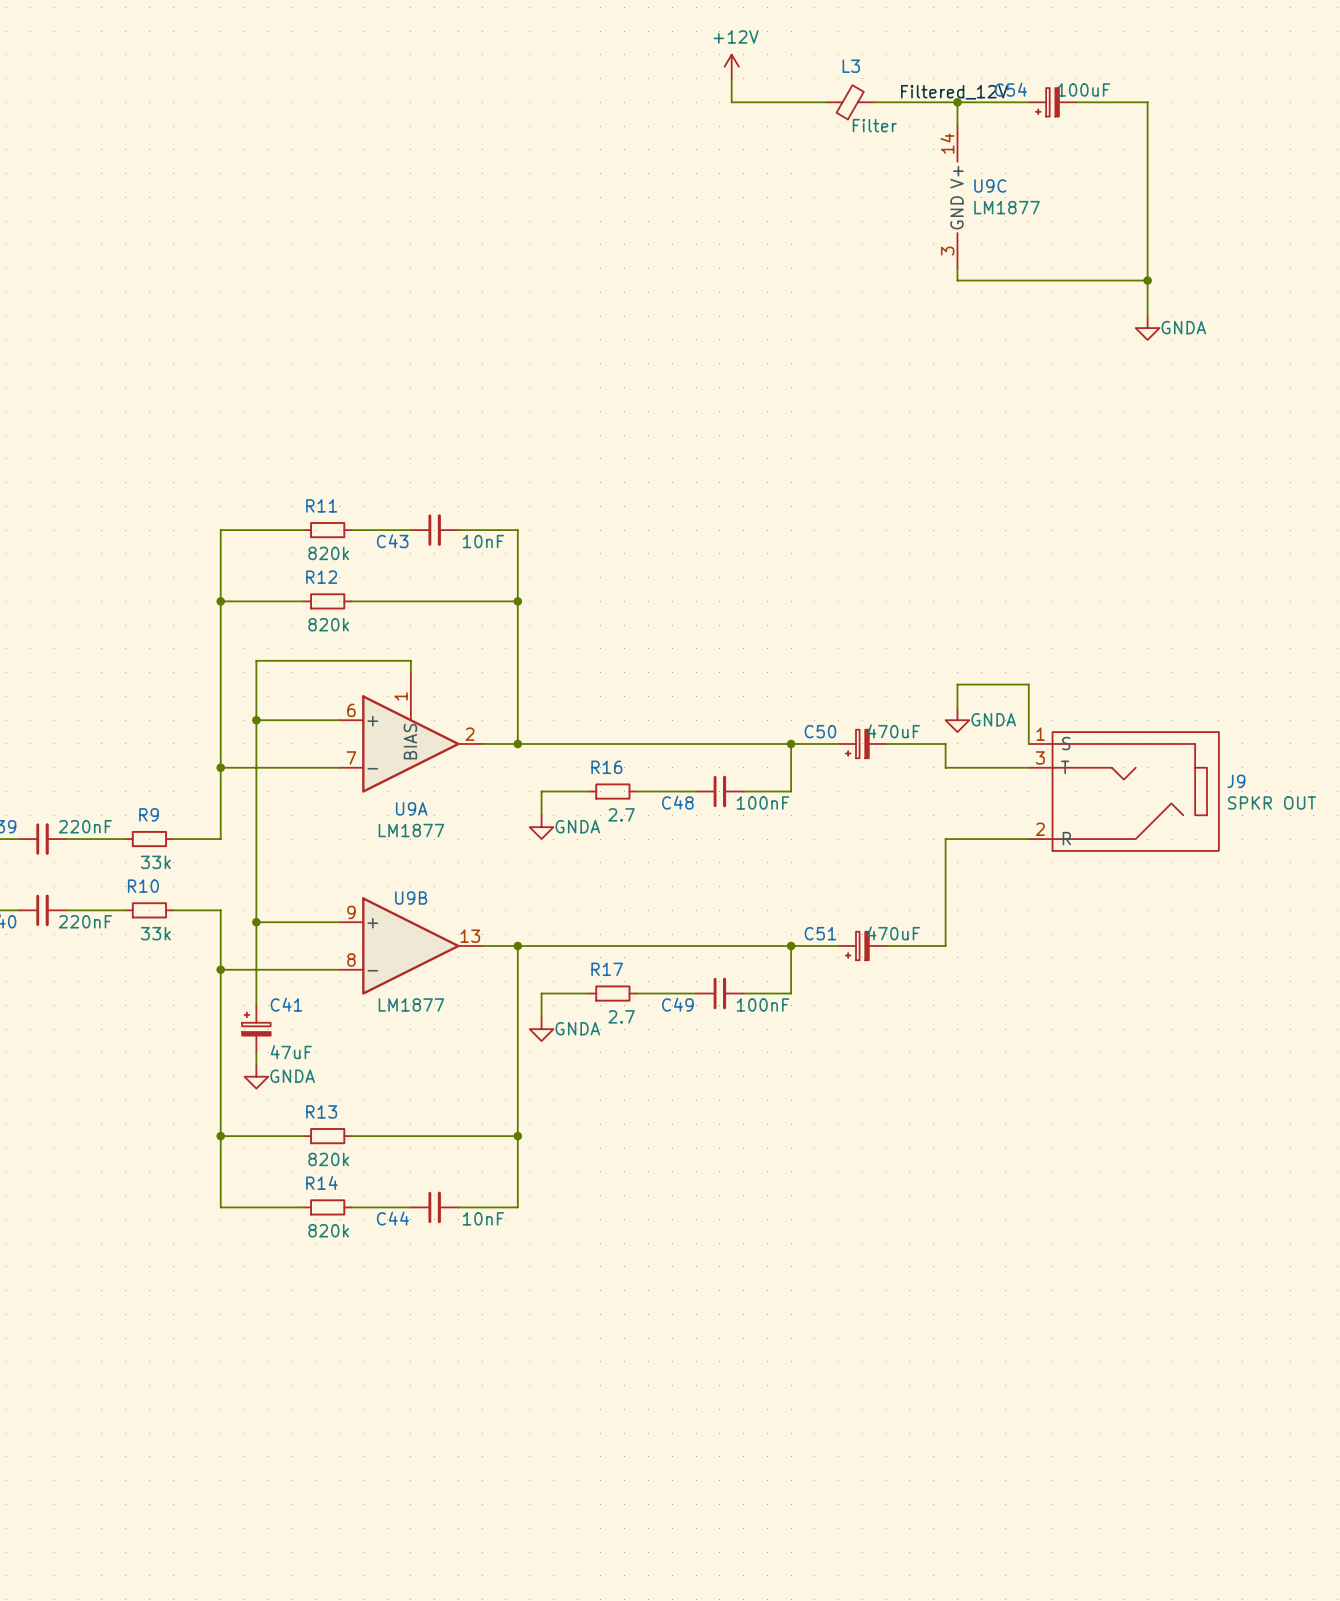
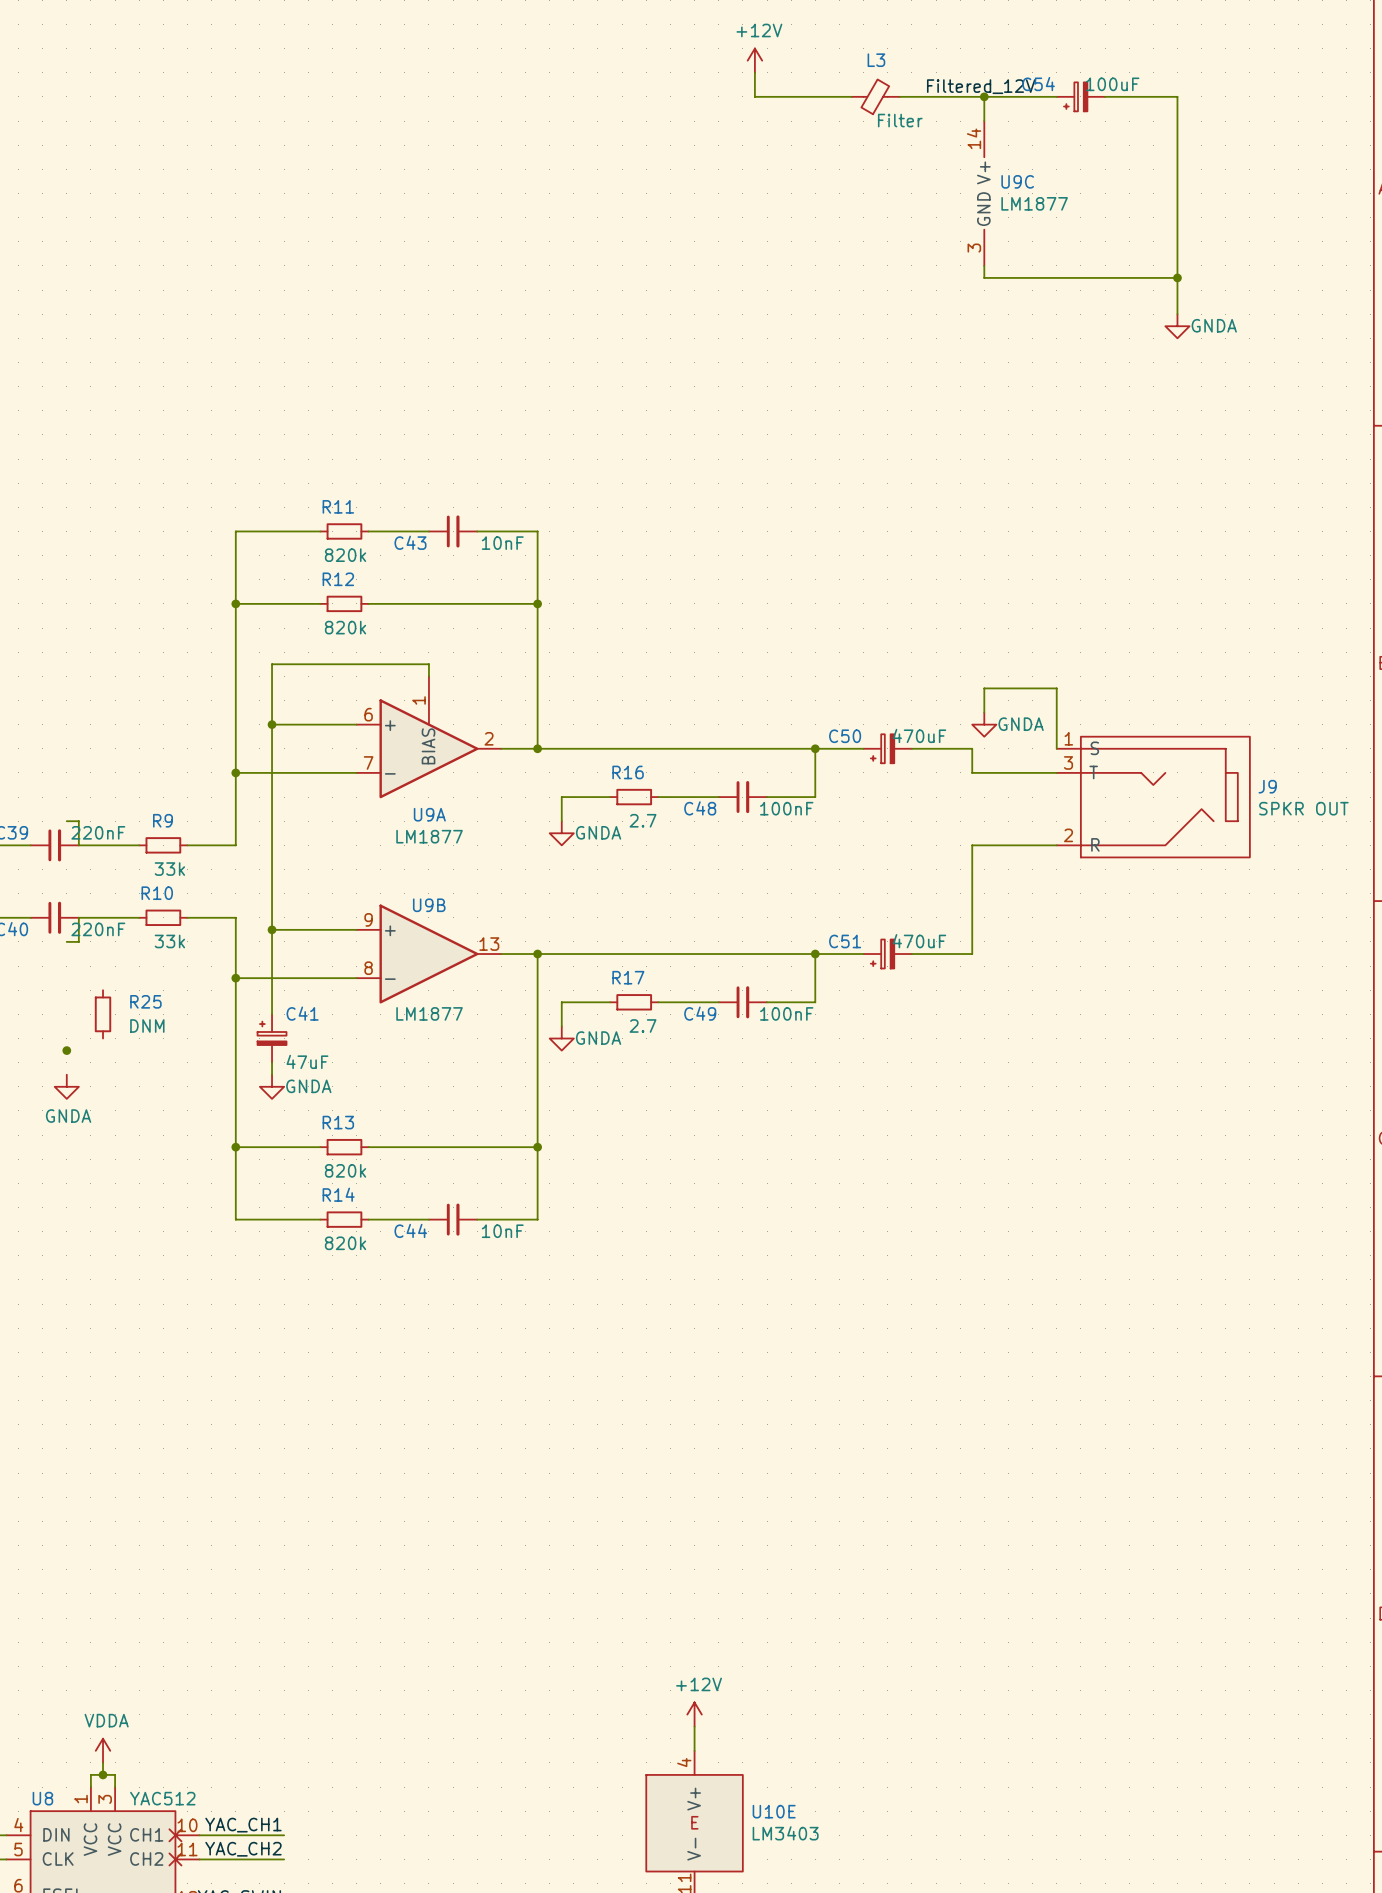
wire: none -> (66, 821) (78, 821) (78, 845)
wire: none -> (78, 917) (78, 941) (66, 941)
R25: none -> DNM (103, 1014)
junction: none -> (66, 1050)
power symbol: none -> GNDA (66, 1086)

